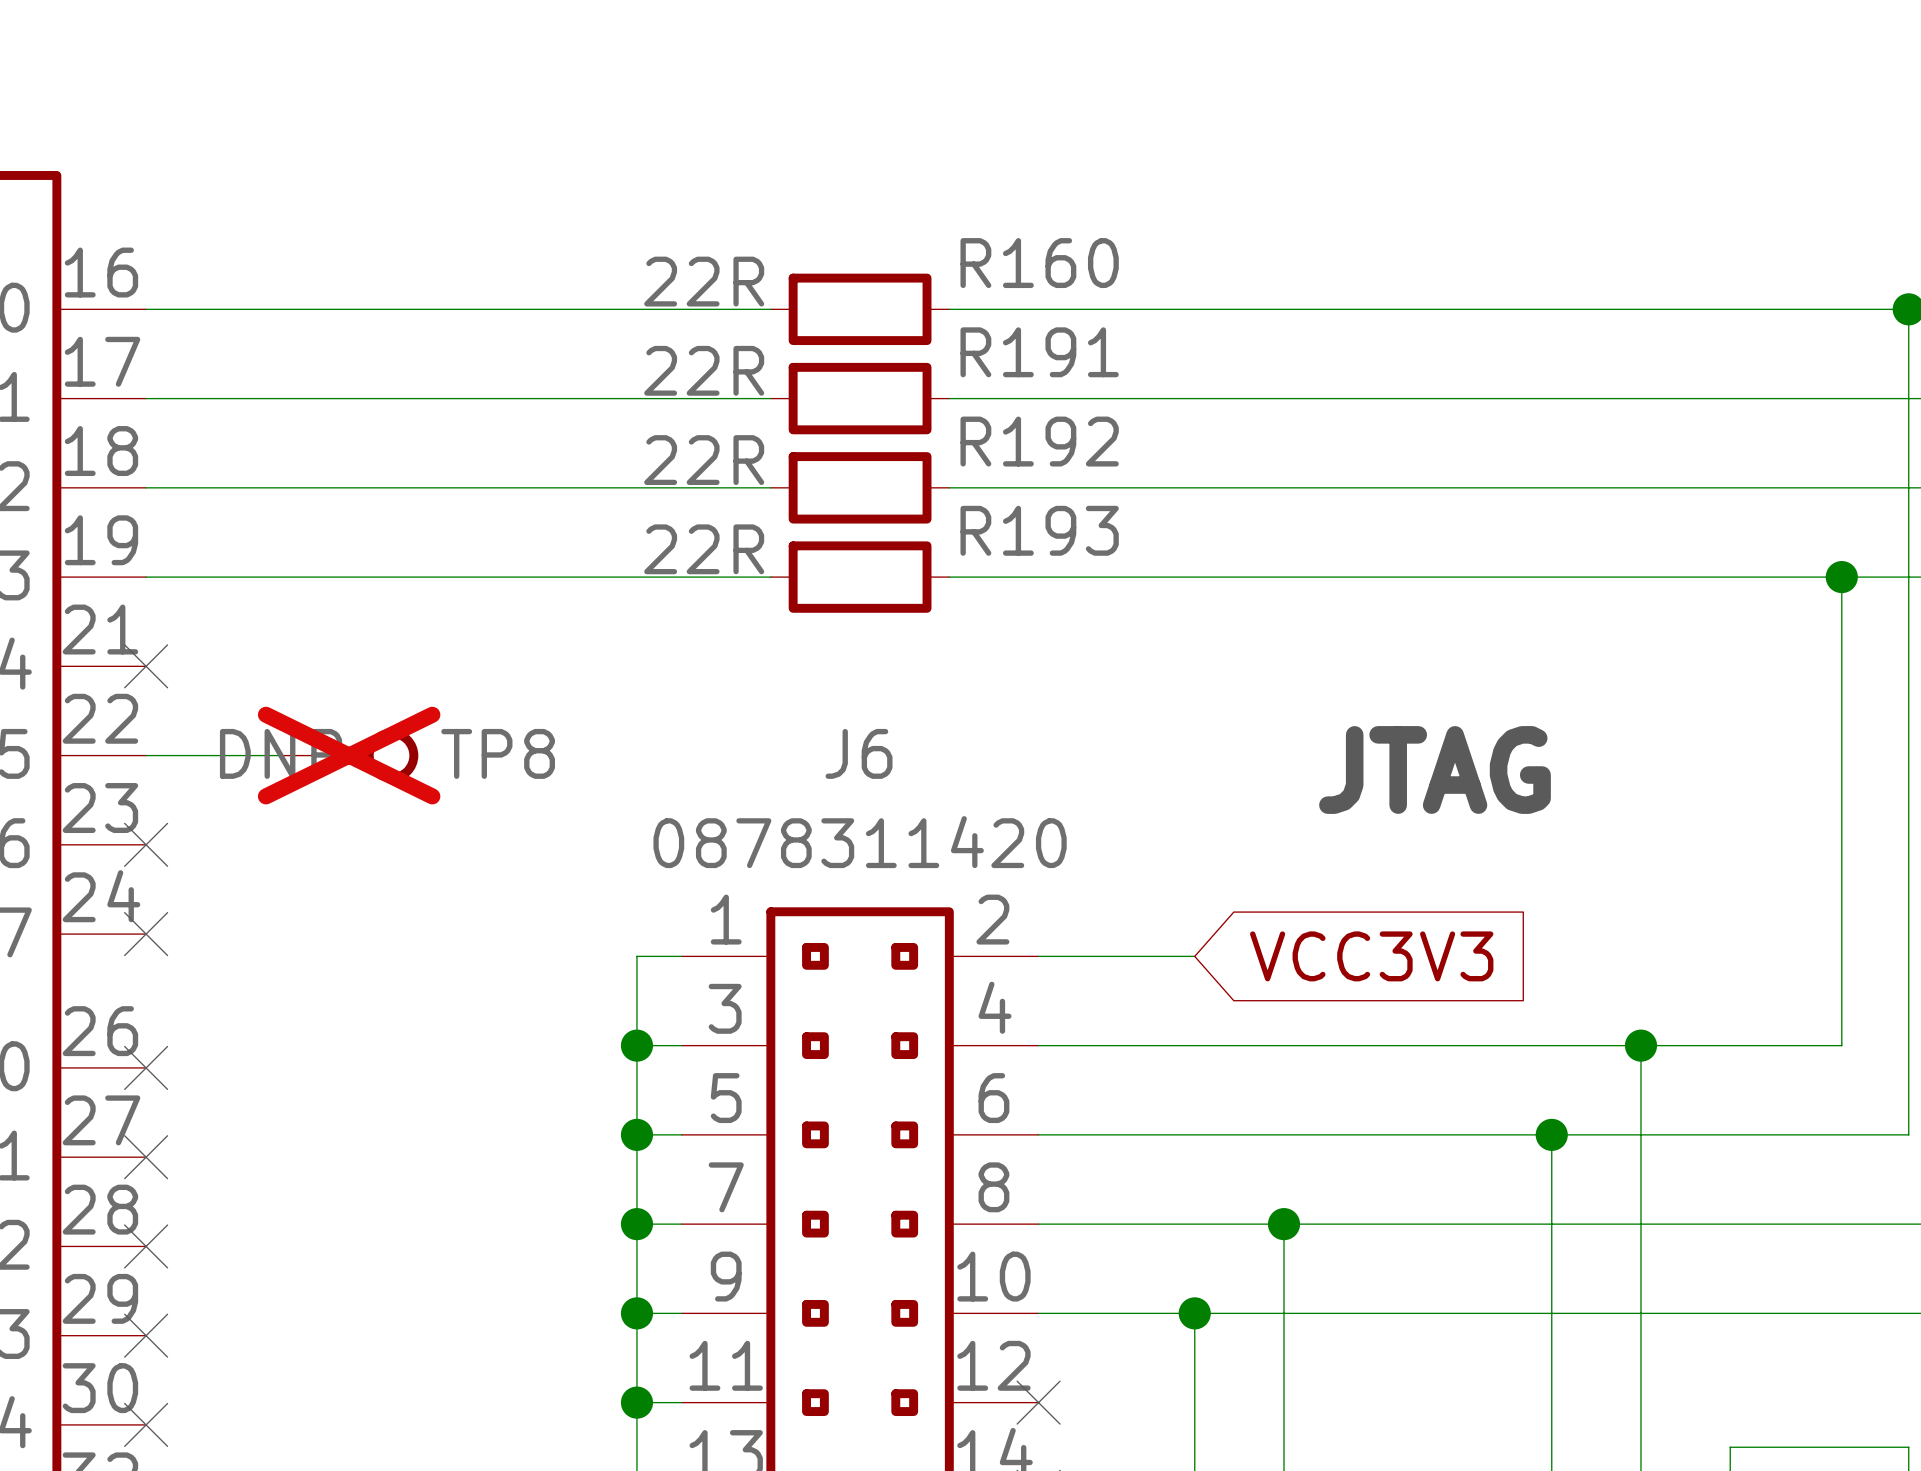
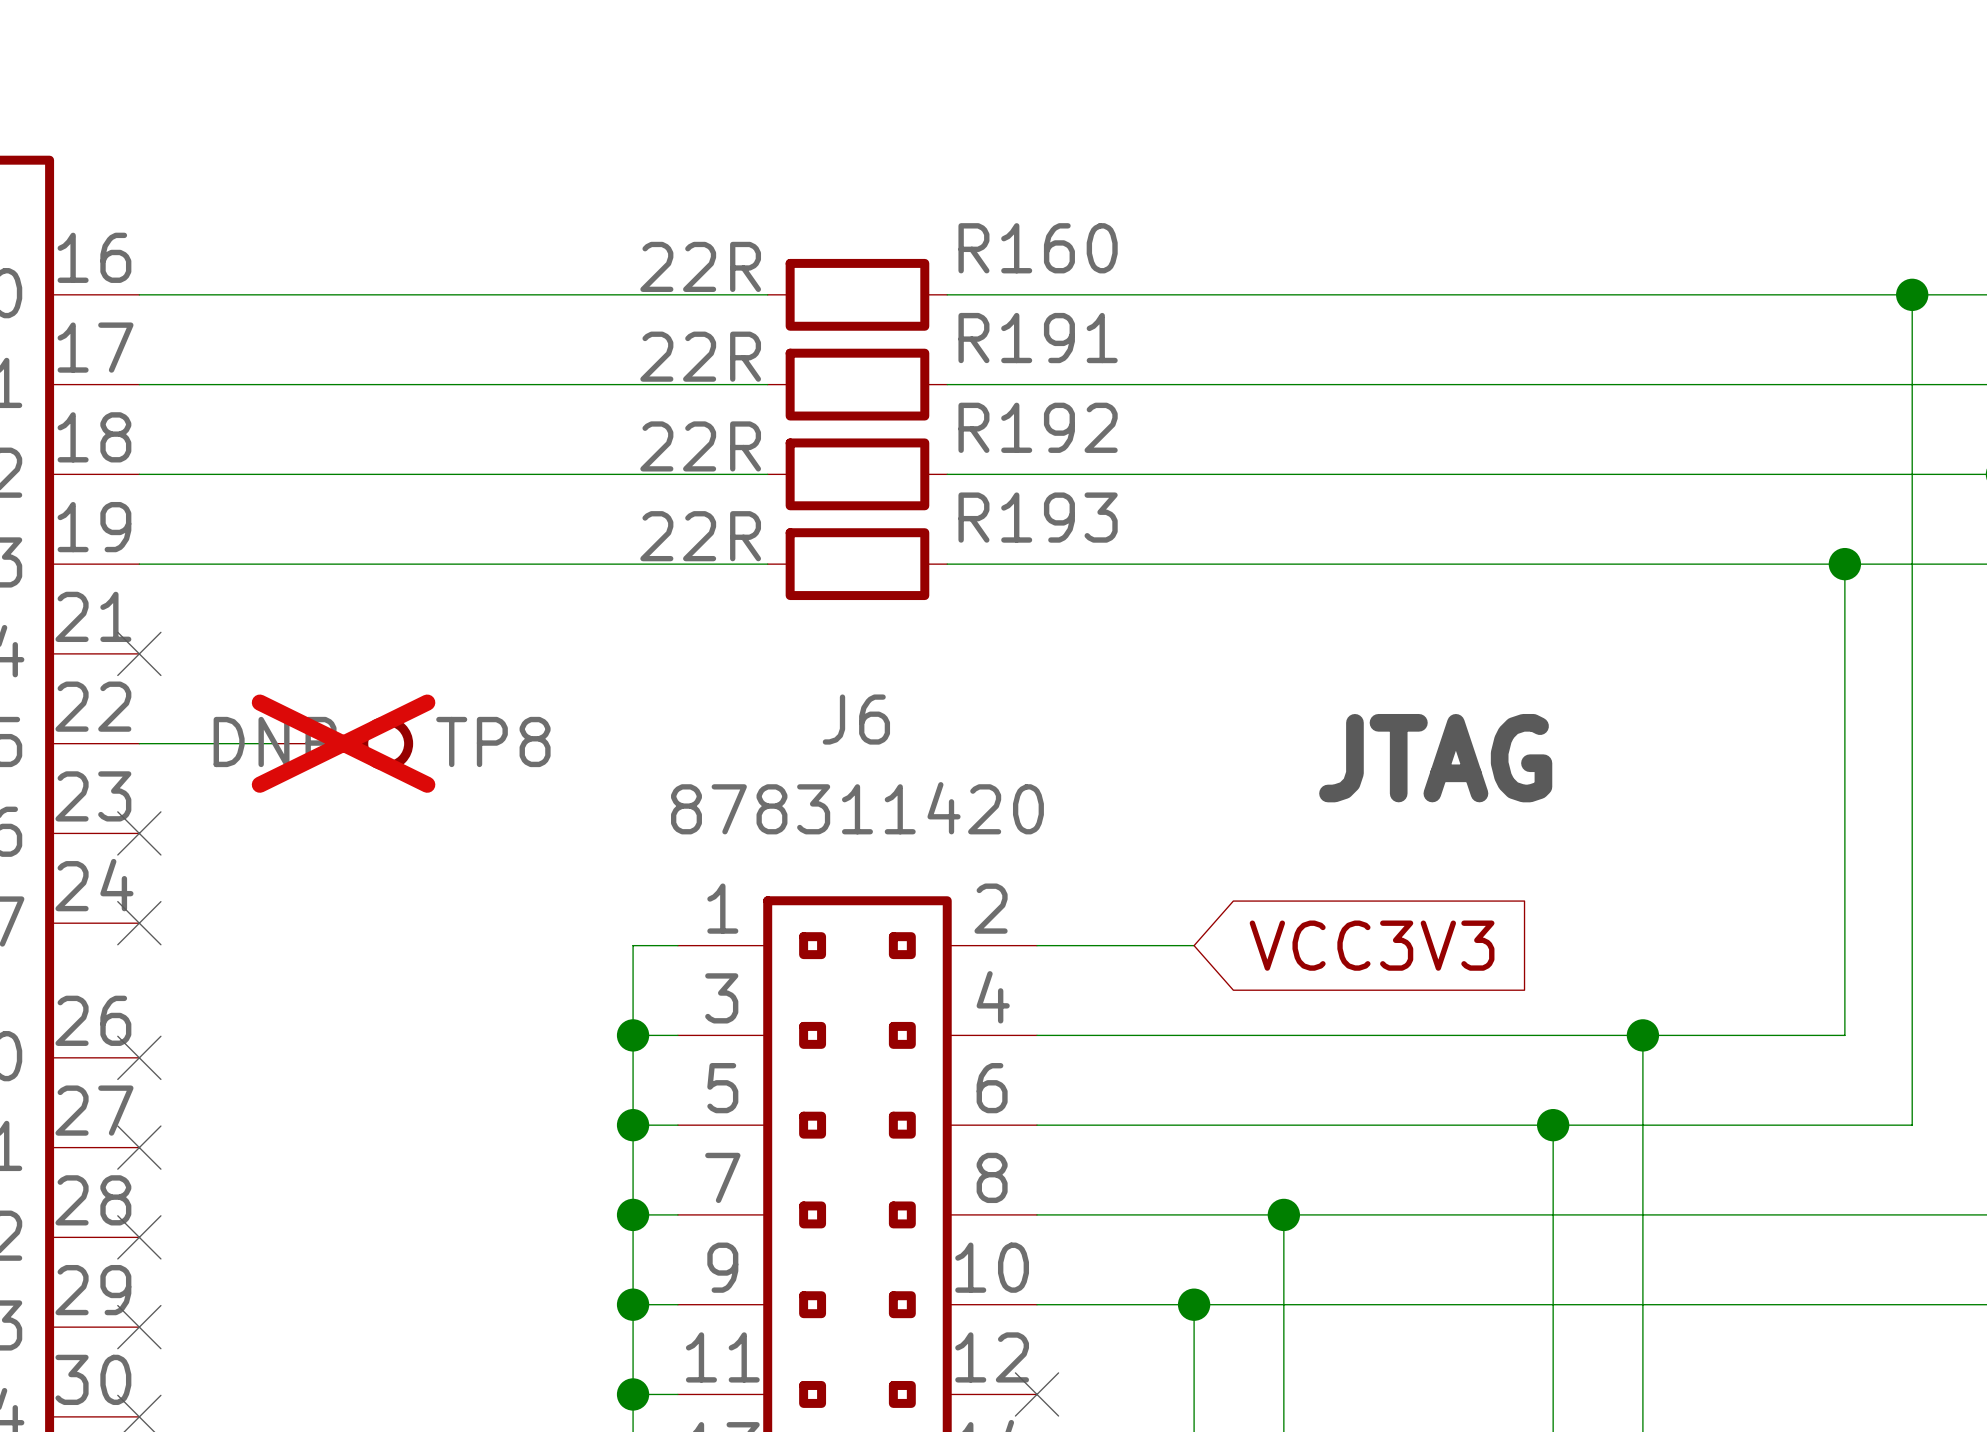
J6 name position: J6 (859, 753) -> J6 (856, 719)
J6 text: 0878311420 (860, 842) -> 878311420 (857, 808)

